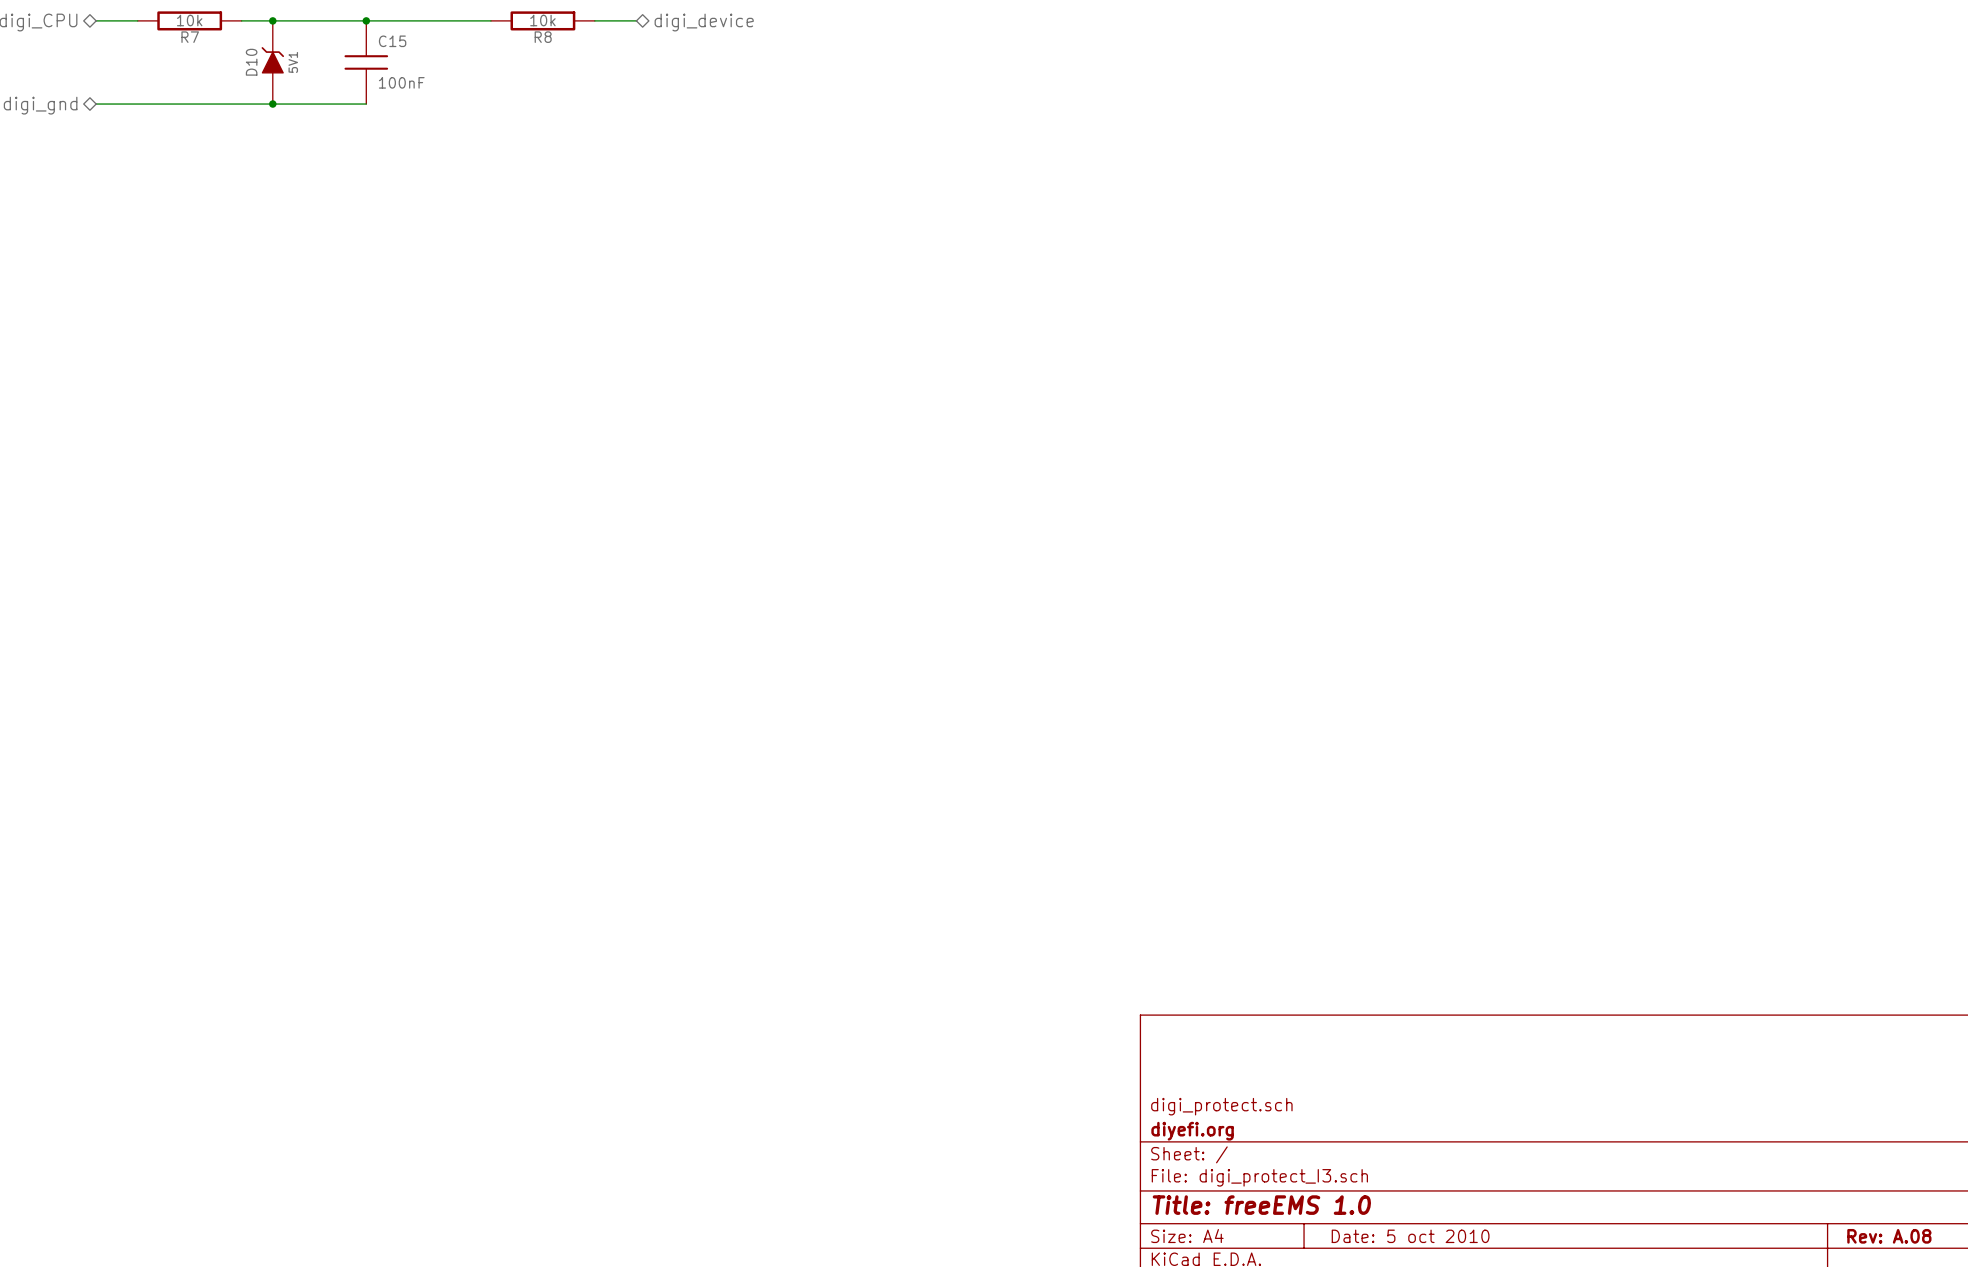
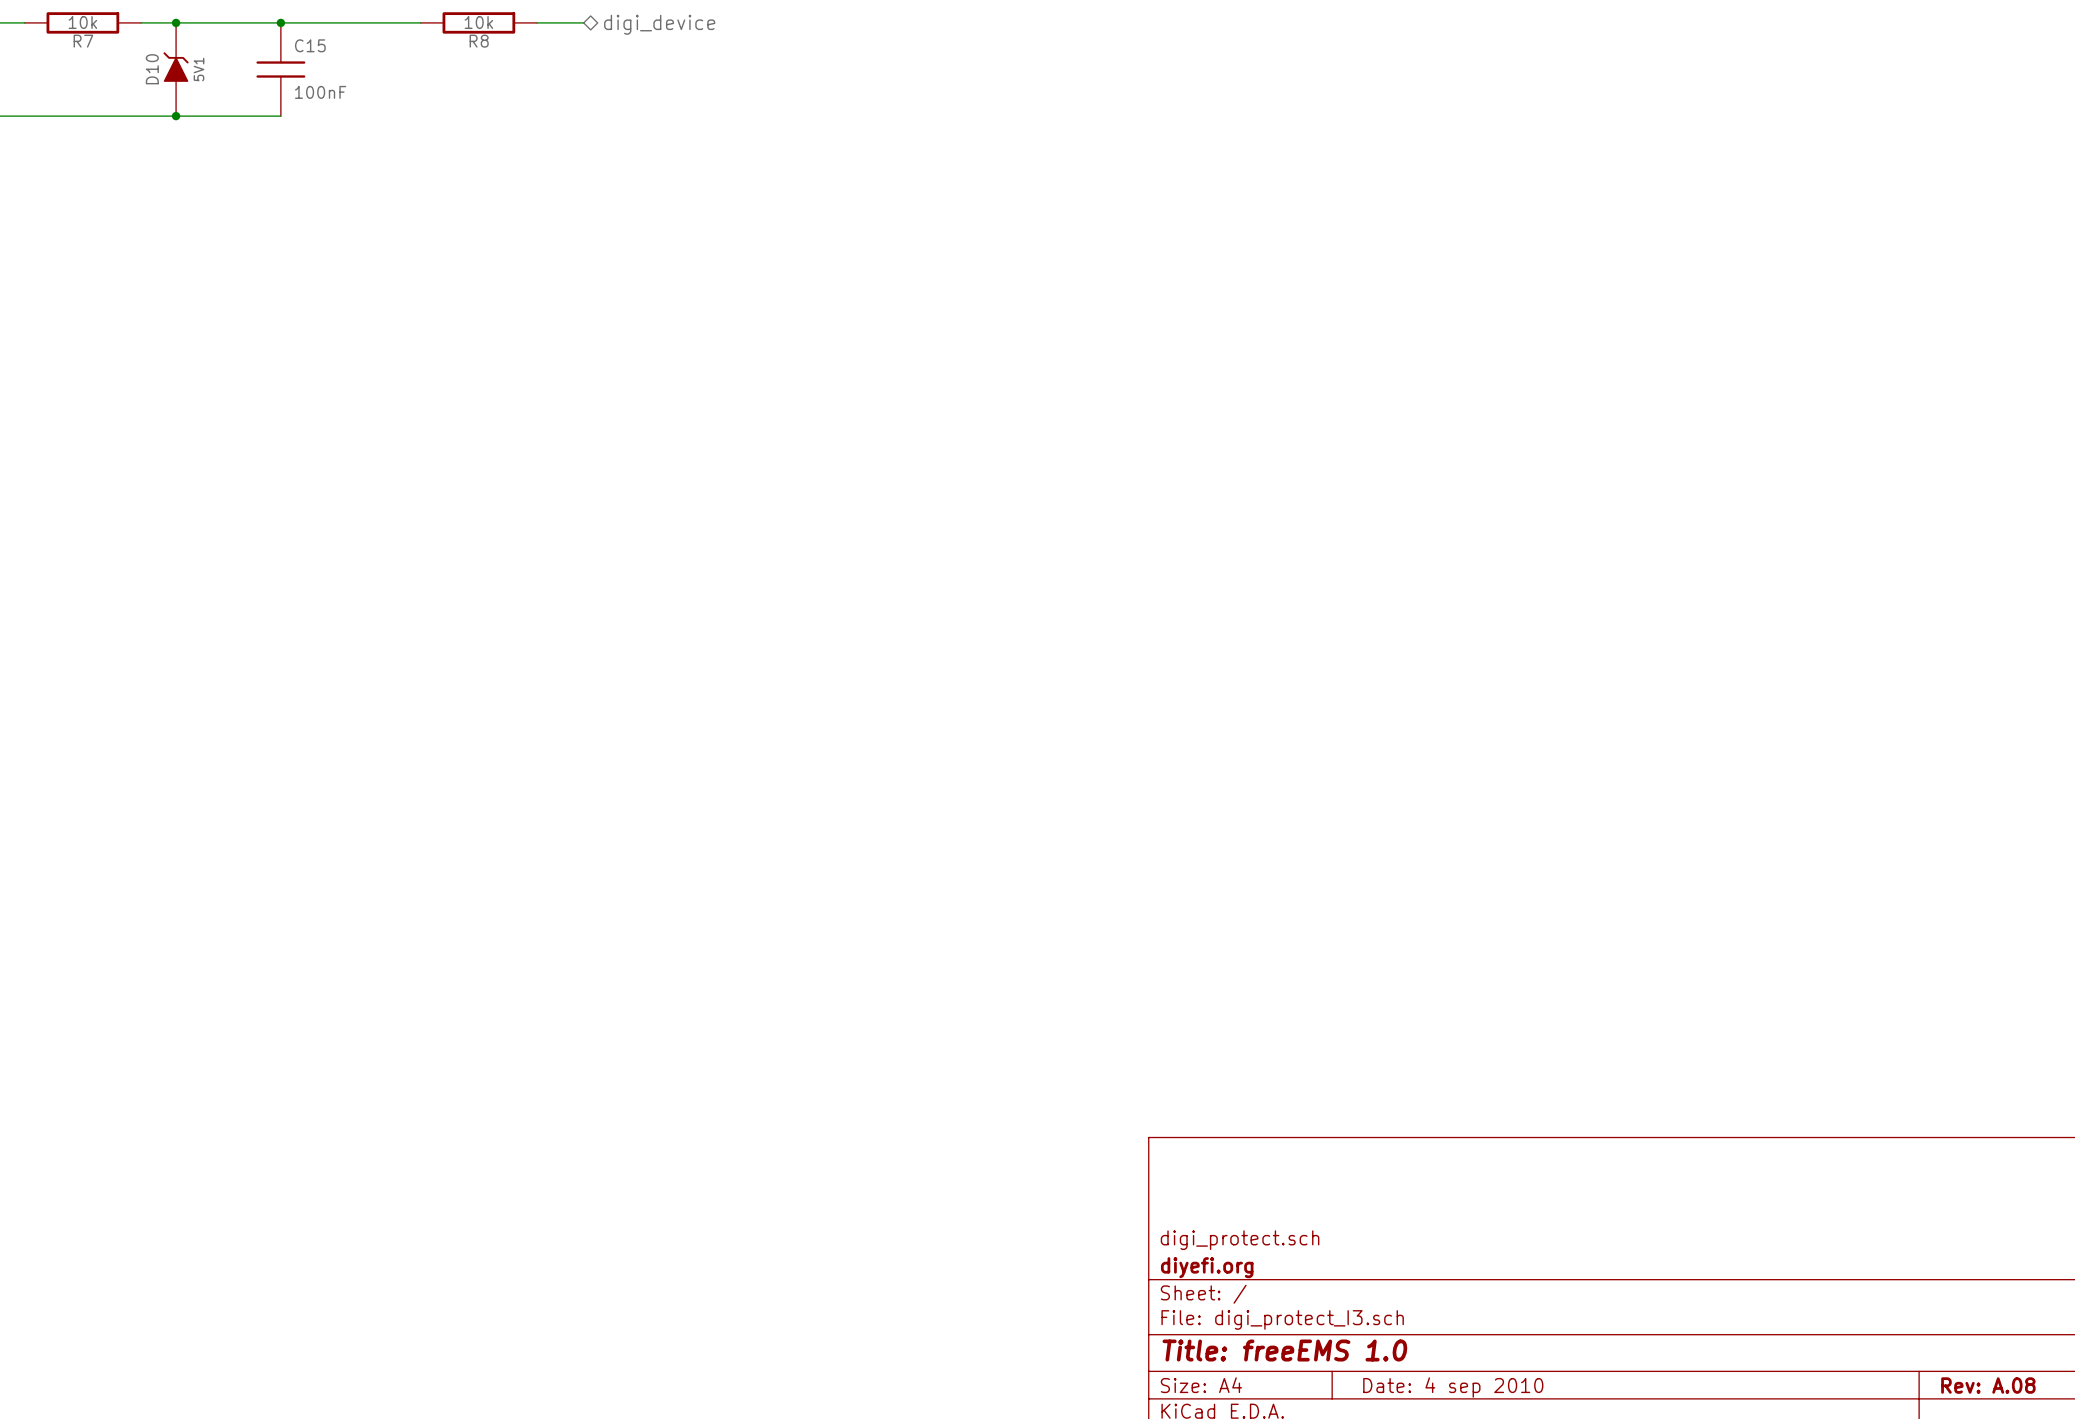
title block: Date: 5 oct 2010 (1410, 1236) -> Date: 4 sep 2010 (1453, 1387)

